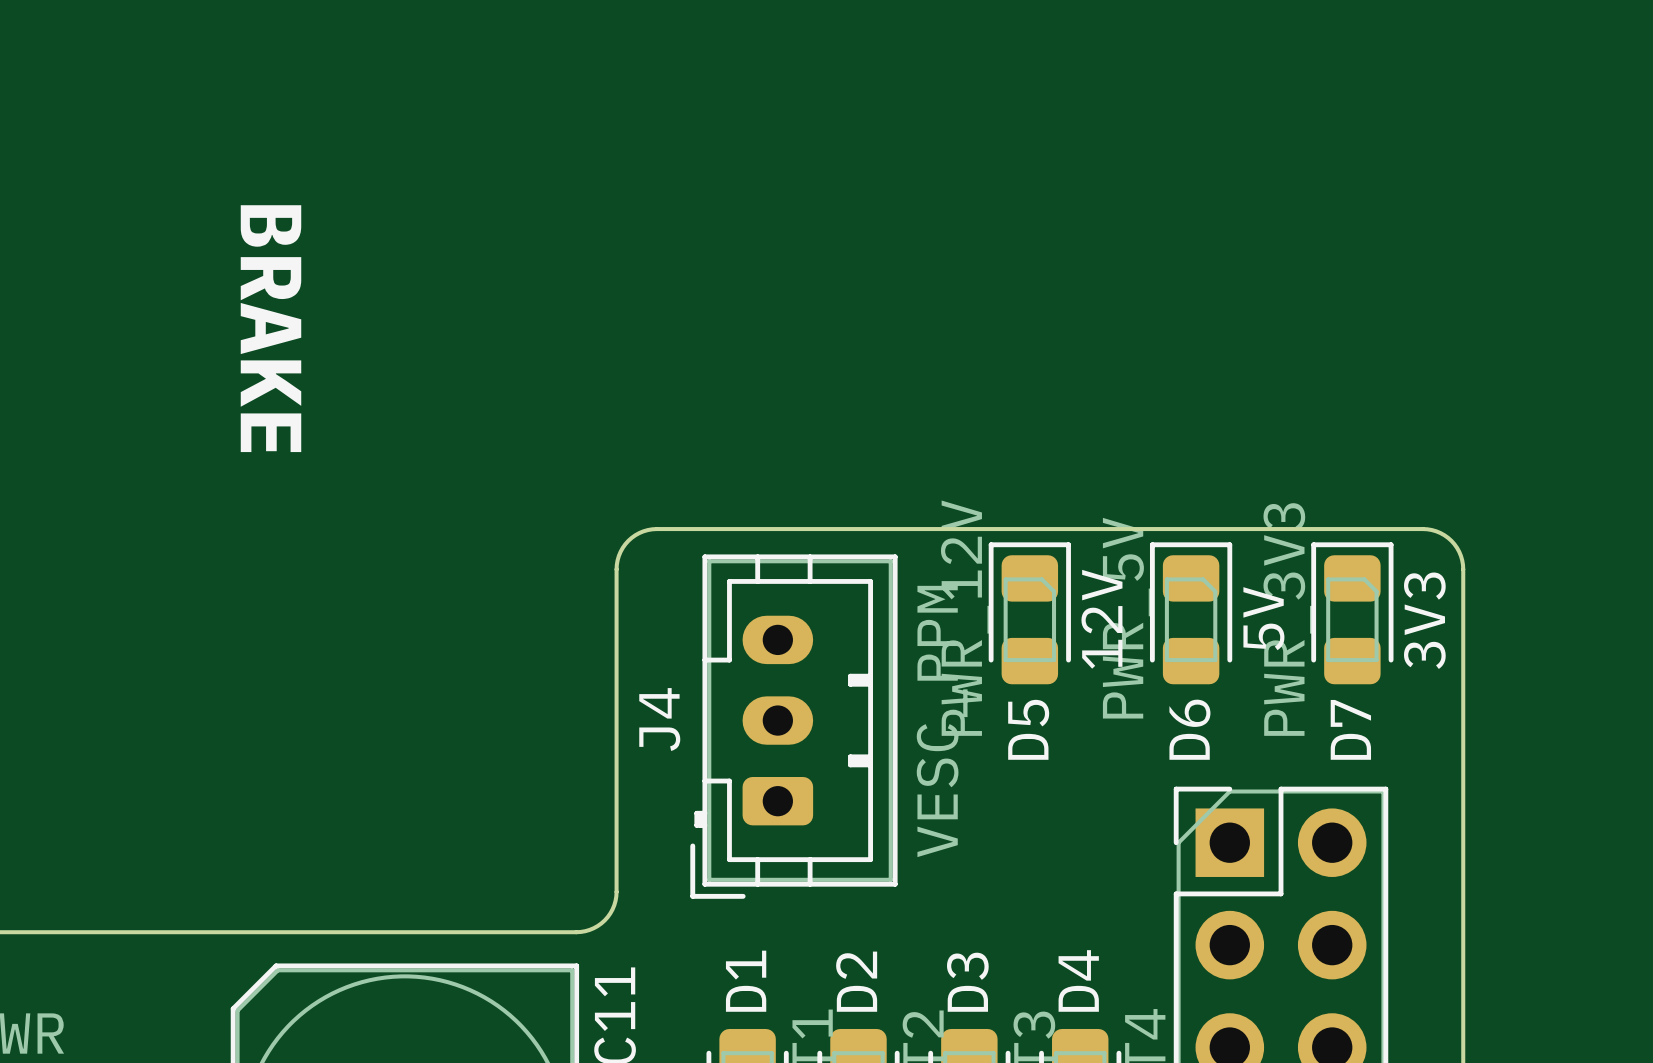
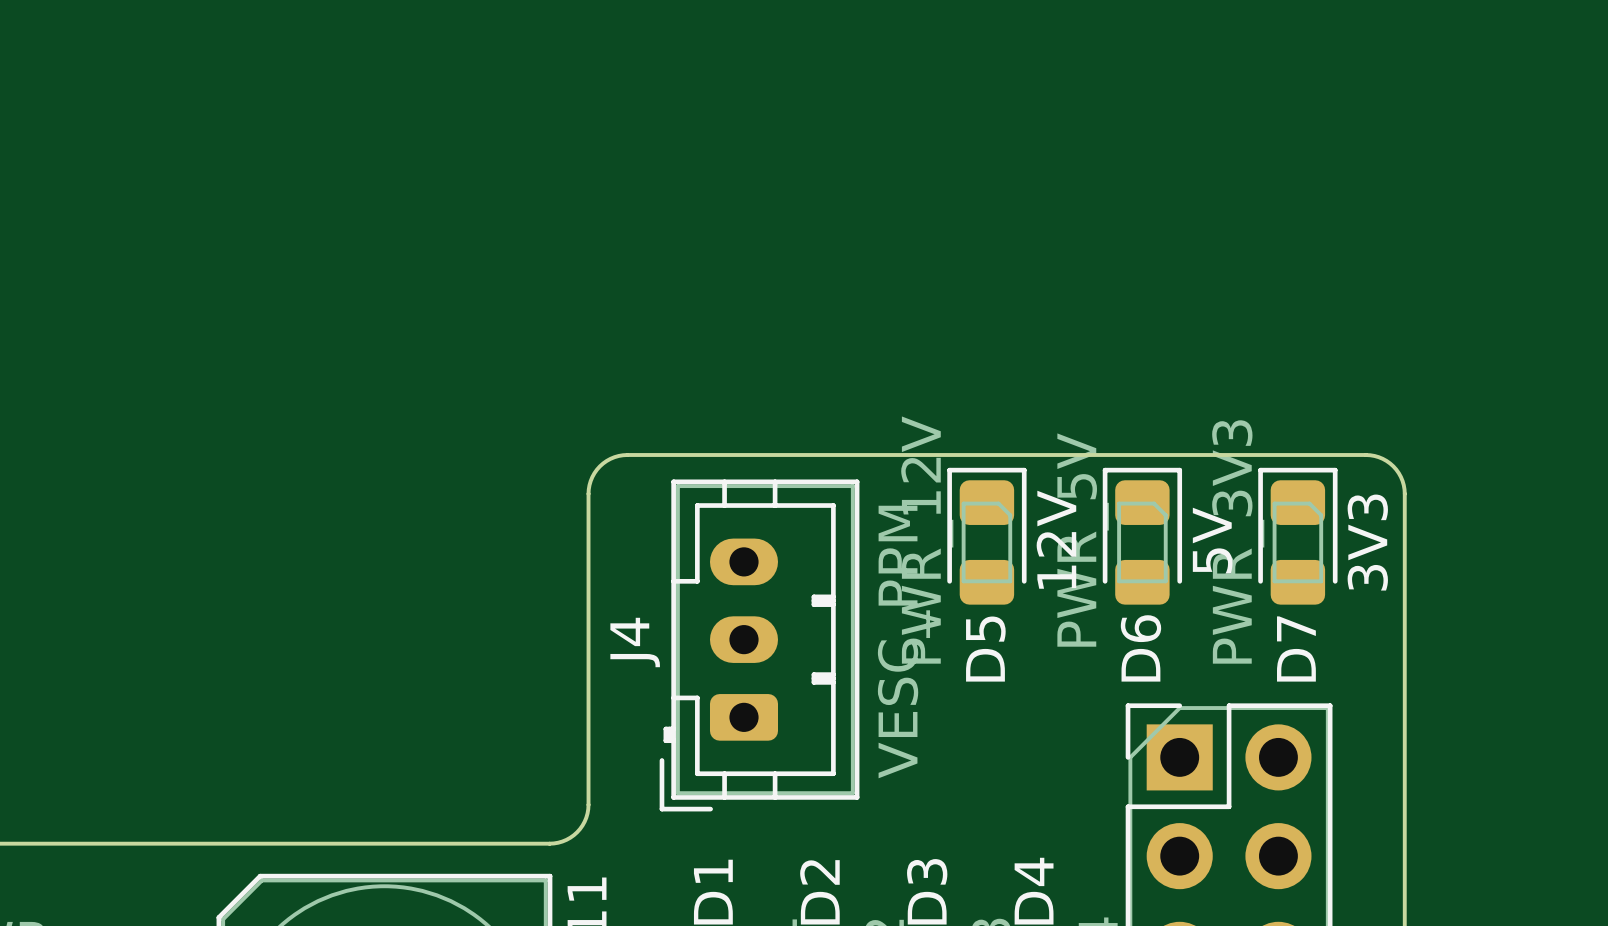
text: BRAKE (270, 328) -> none

